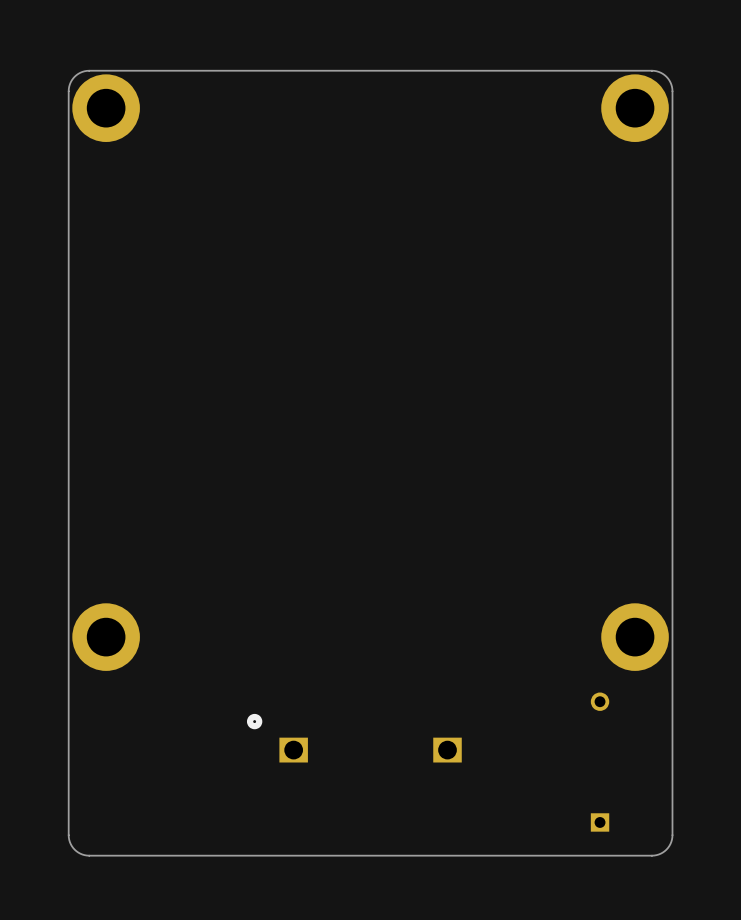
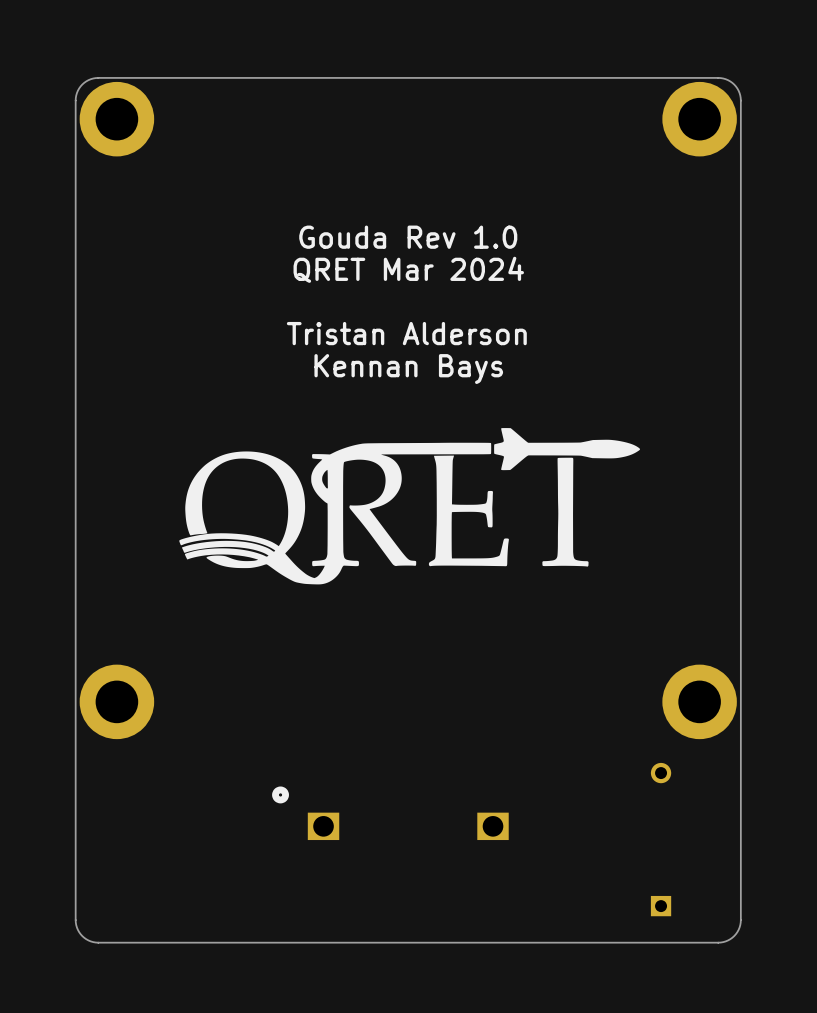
text: none -> Gouda Rev 1.0 (408, 237)
text: none -> QRET Mar 2024 (408, 269)
text: none -> Tristan Alderson (406, 333)
text: none -> Kennan Bays (408, 369)
drawing: none -> [179, 428, 640, 585]

